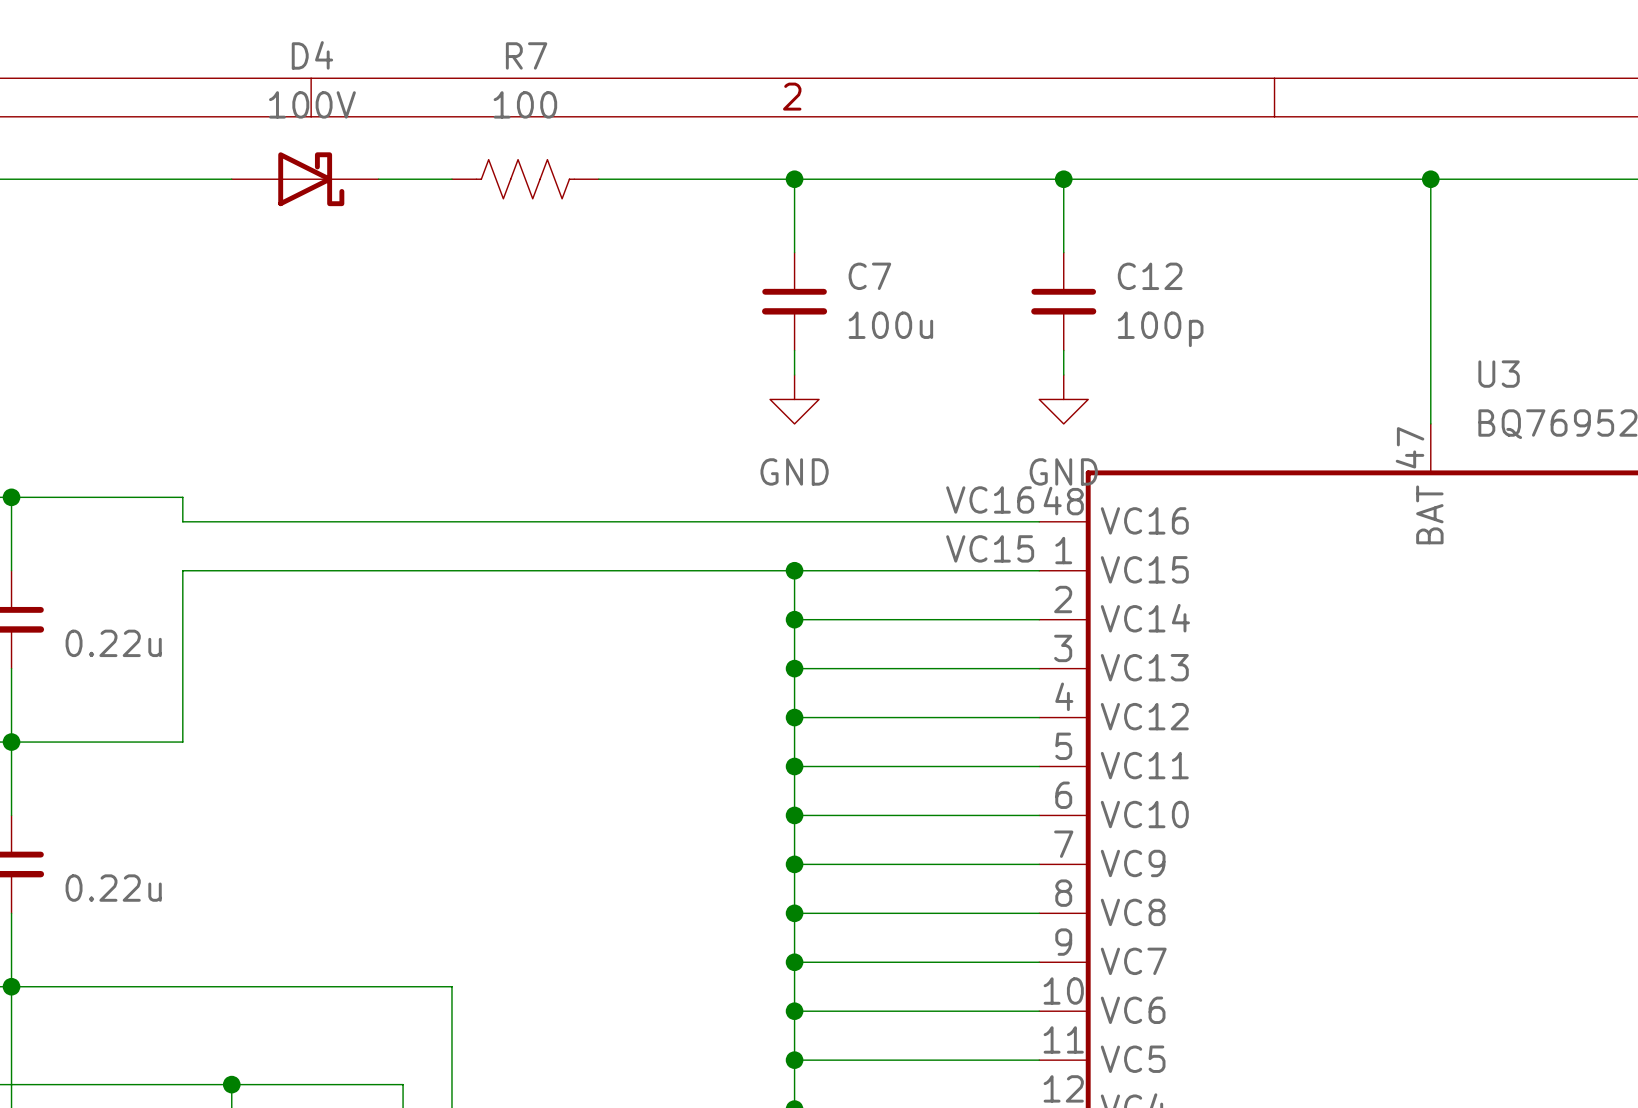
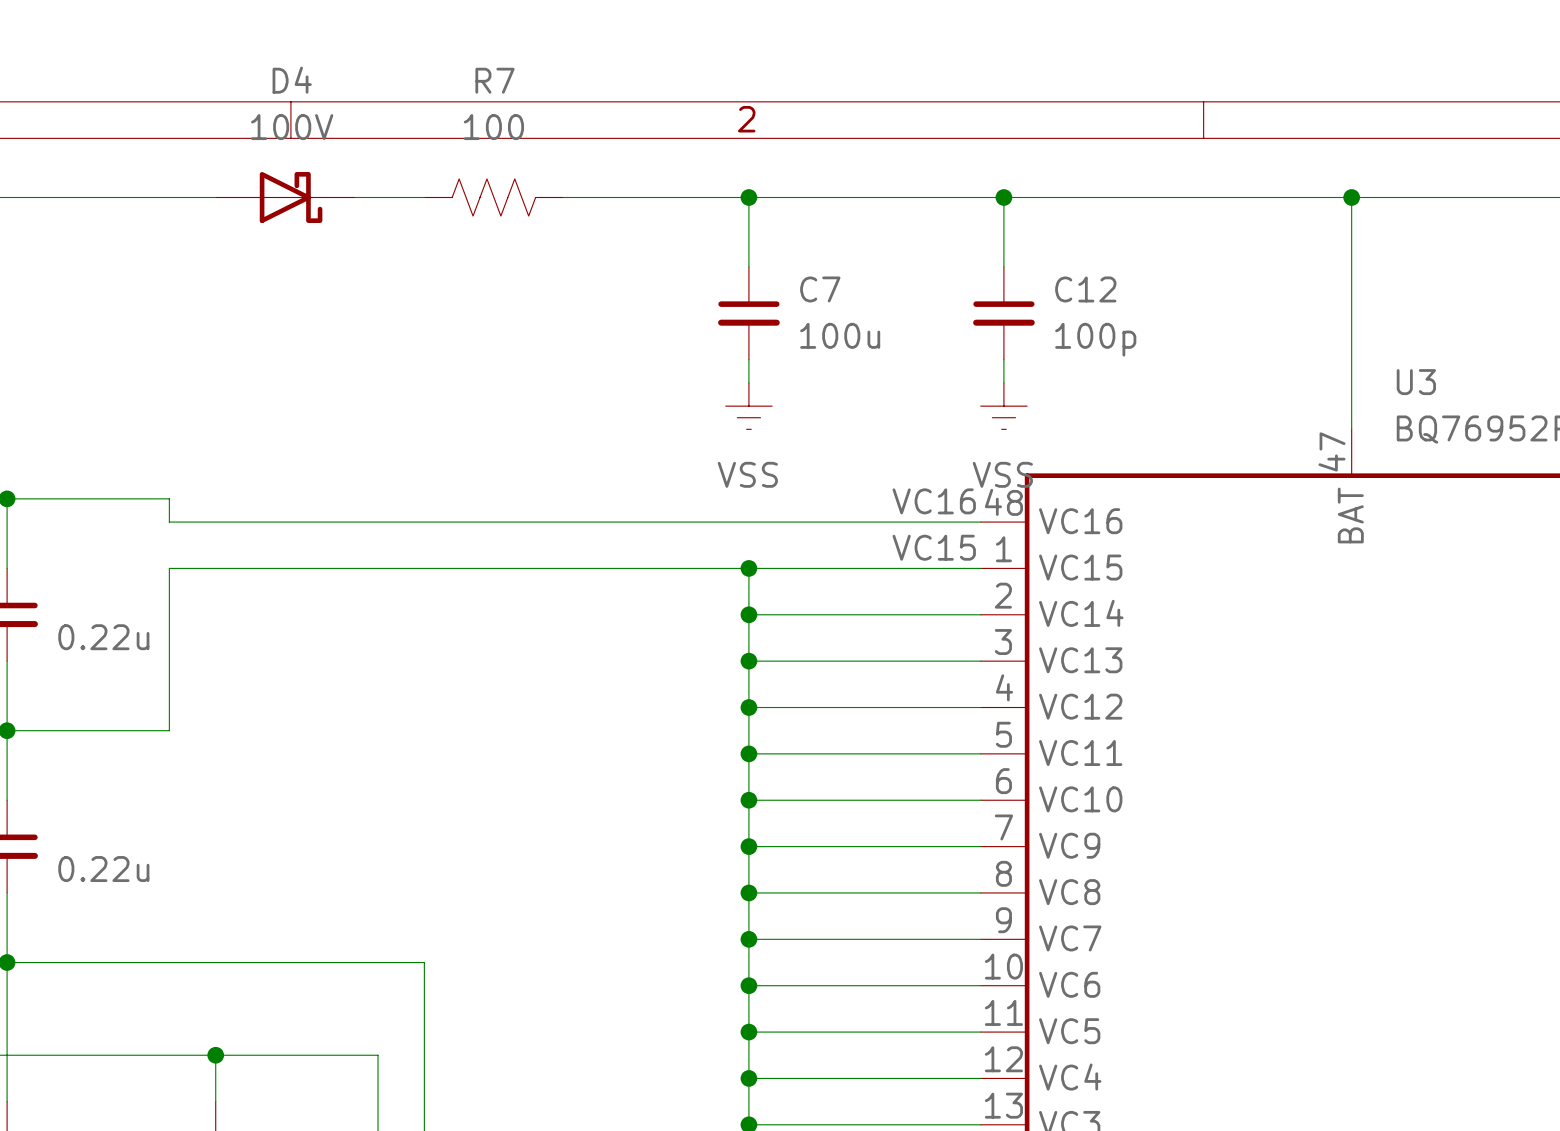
power symbol: GND (794, 399) -> VSS (748, 406)
power symbol: GND (1063, 399) -> VSS (1003, 406)

